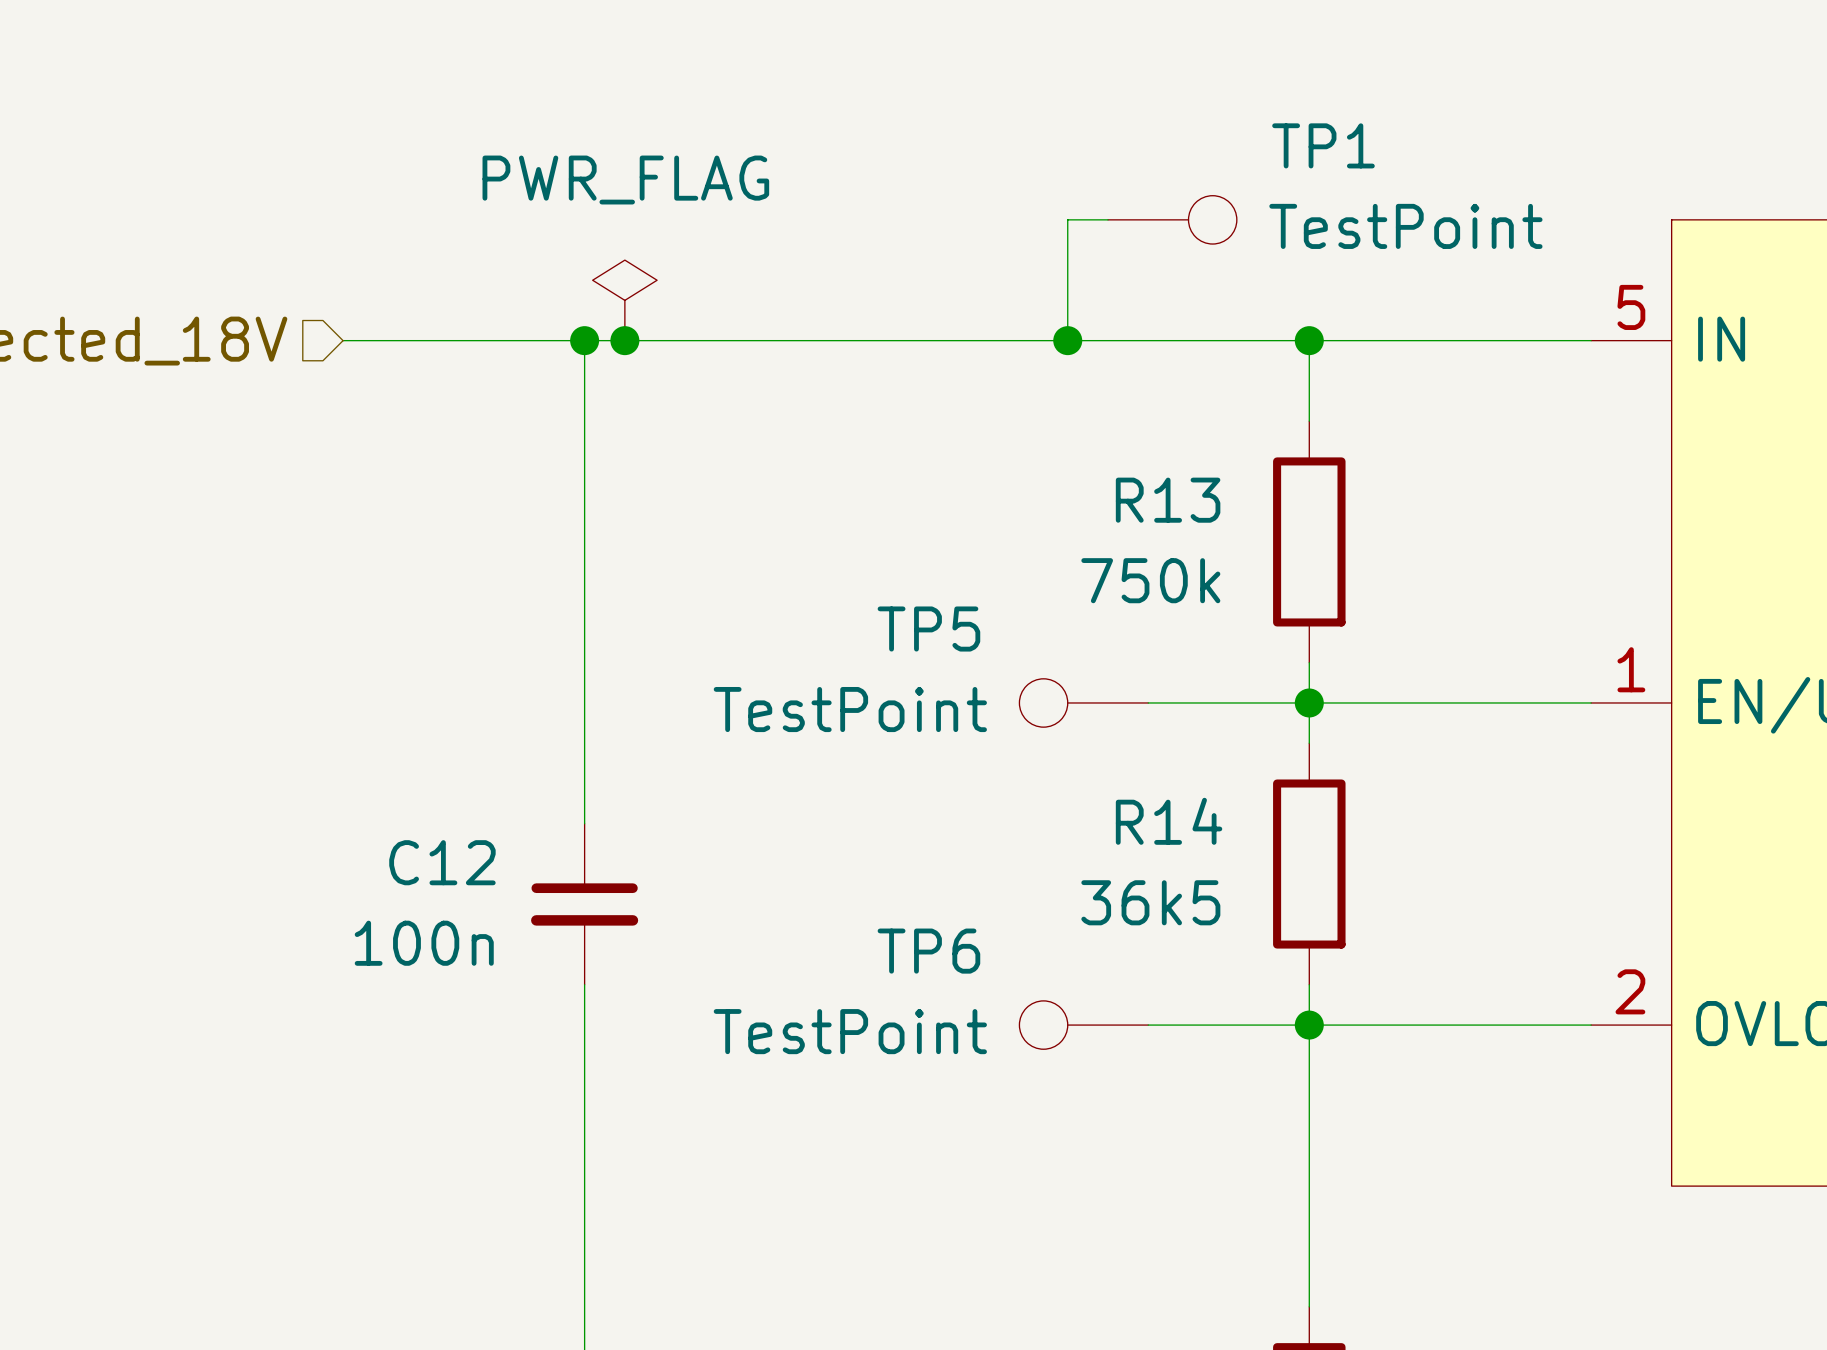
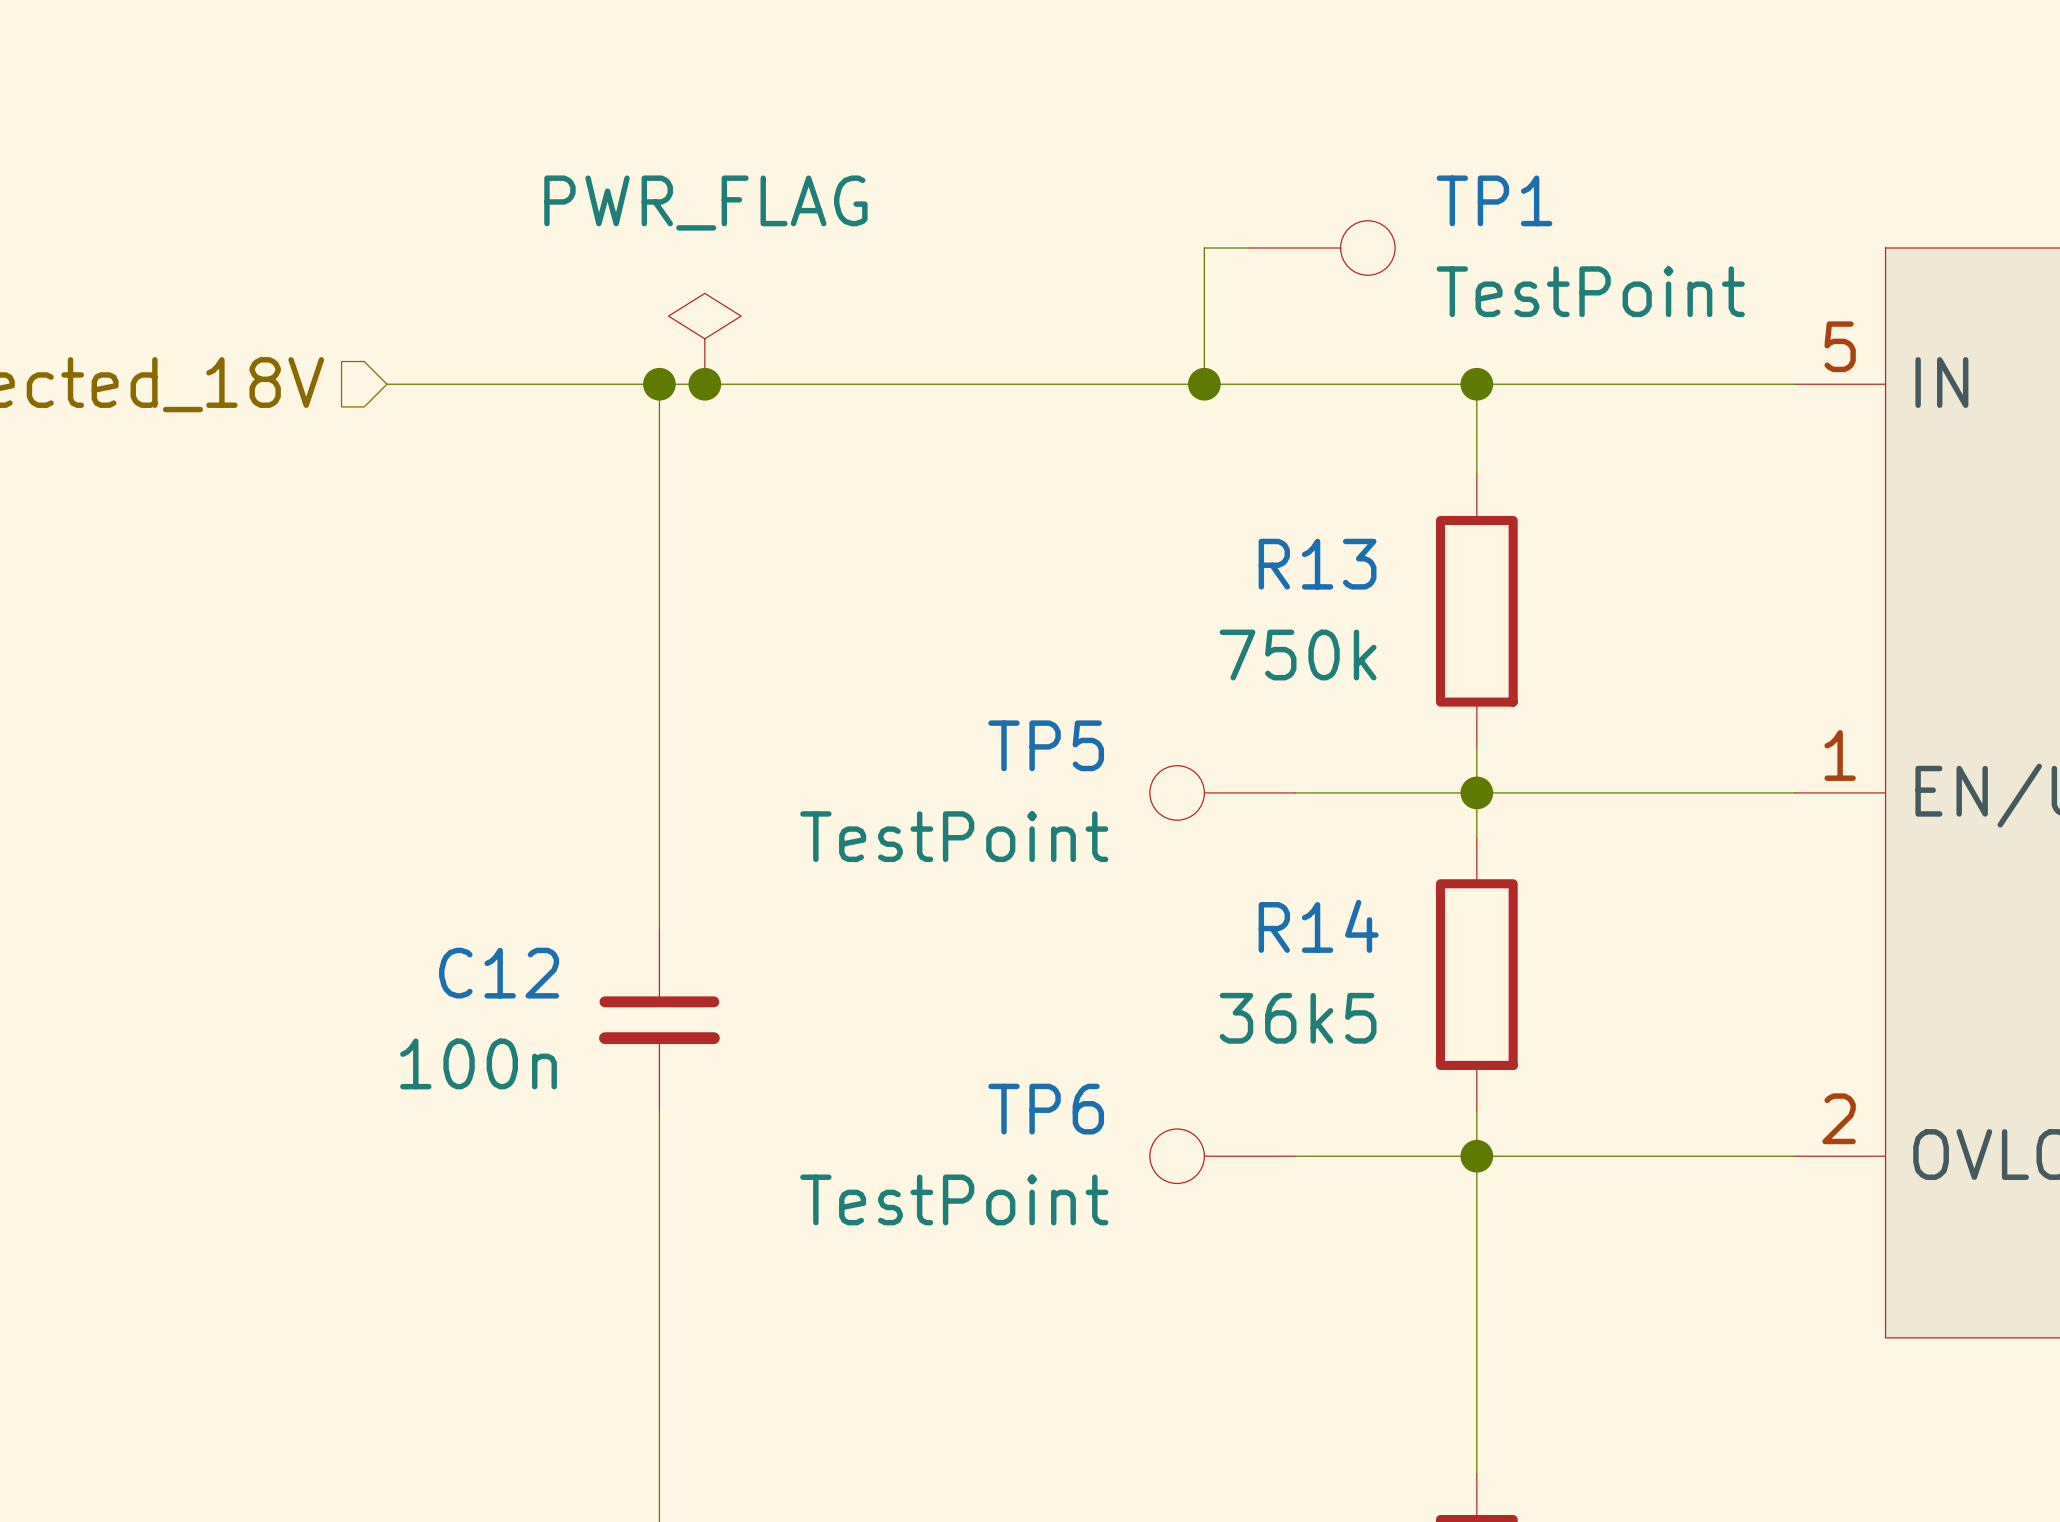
TP1 name position: TP1 (1323, 145) -> TP1 (1494, 200)
TP1 value position: TestPoint (1405, 226) -> TestPoint (1590, 291)
TP5 name position: TP5 (928, 629) -> TP5 (1046, 745)
TP5 value position: TestPoint (850, 709) -> TestPoint (954, 836)
TP6 name position: TP6 (928, 951) -> TP6 (1046, 1109)
TP6 value position: TestPoint (850, 1031) -> TestPoint (954, 1199)

